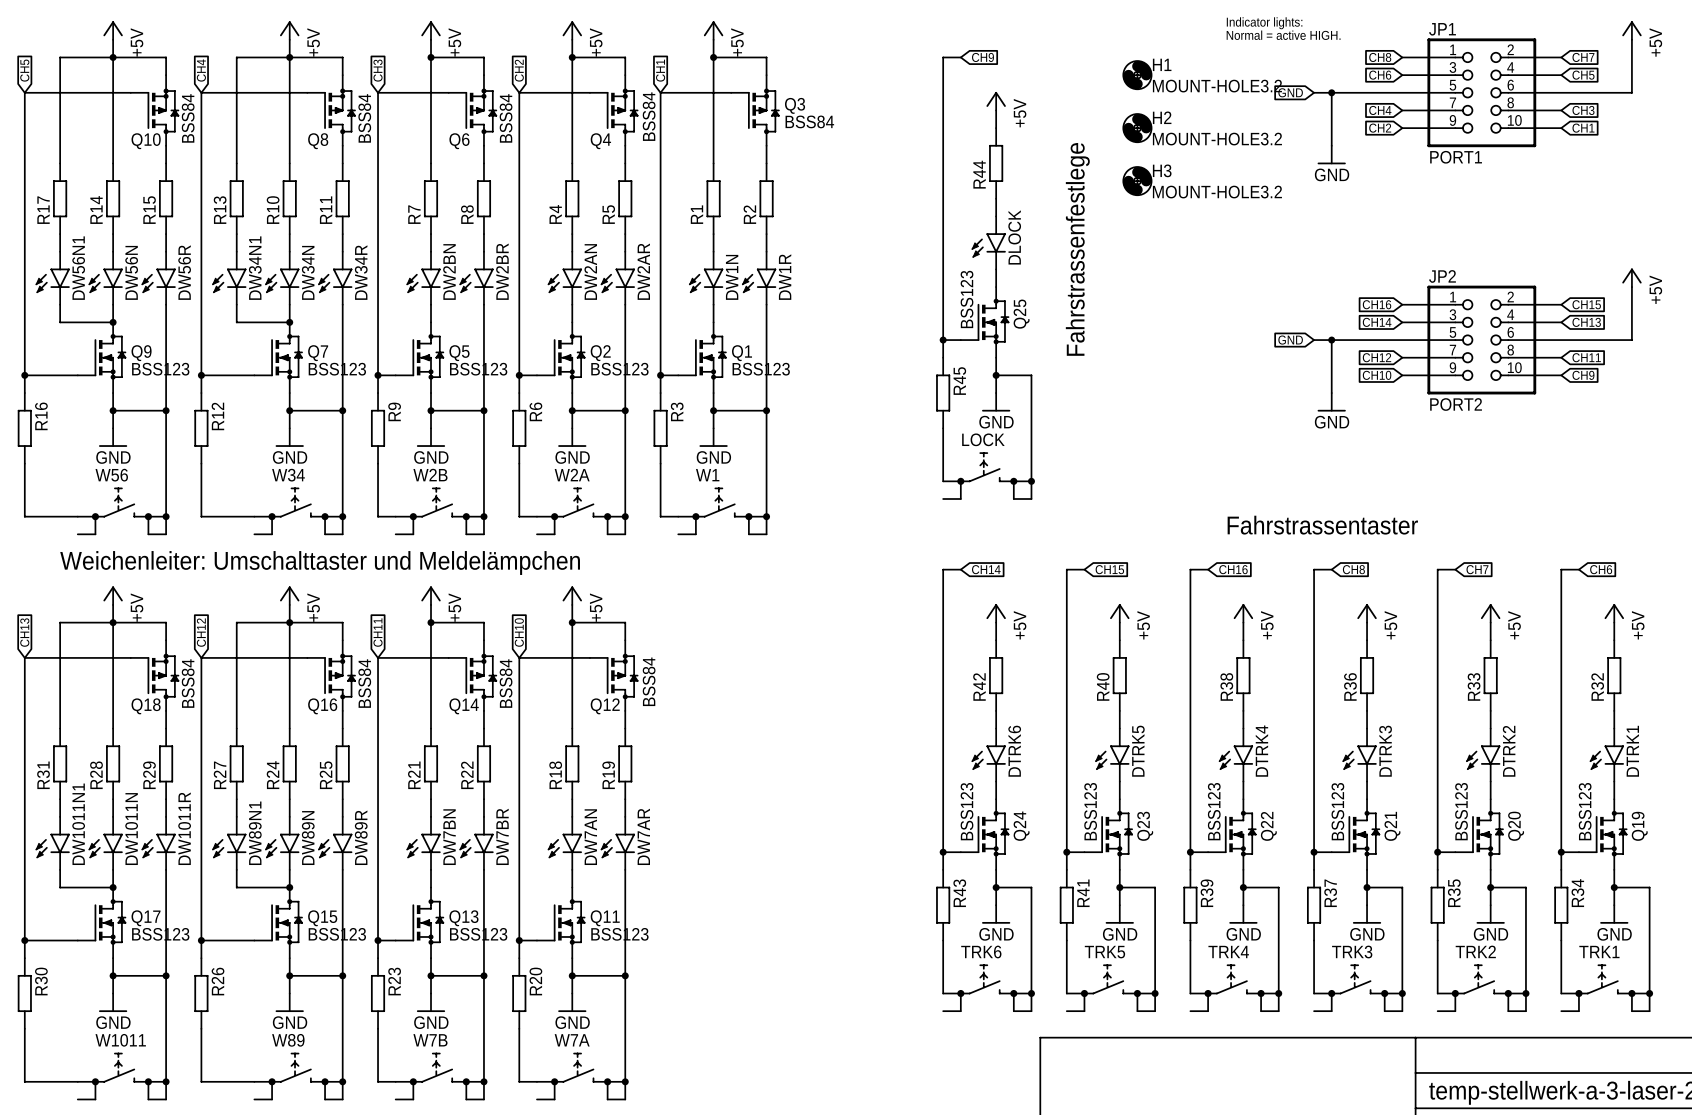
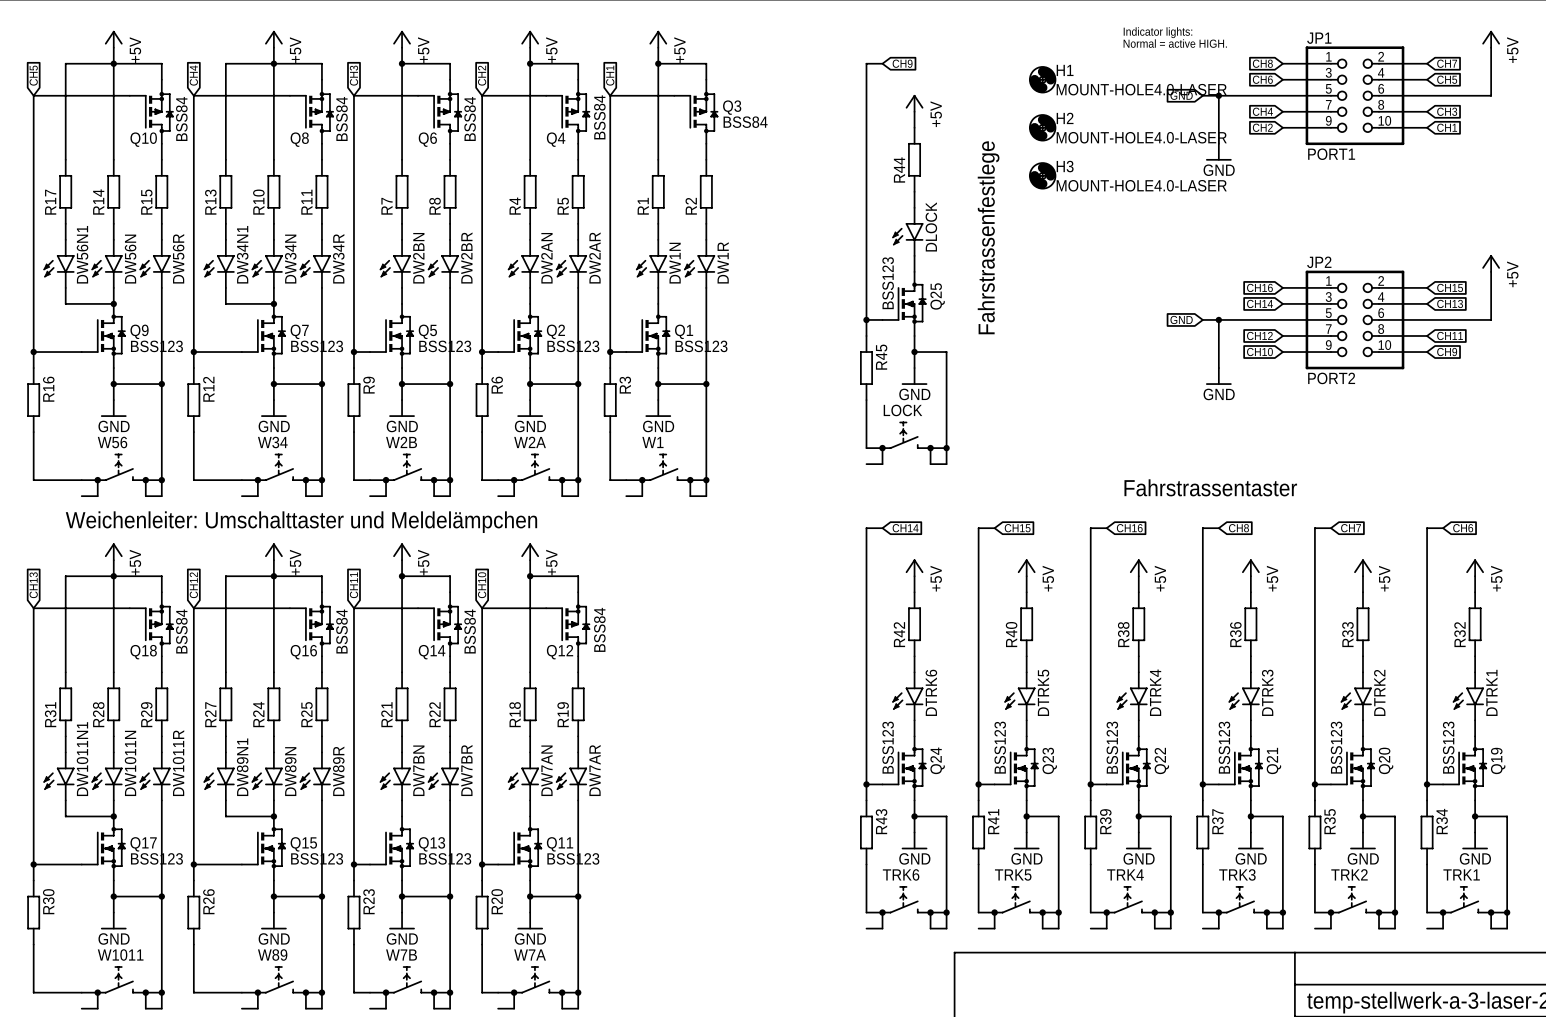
H1 value: MOUNT-HOLE3.2 (1217, 86) -> MOUNT-HOLE4.0-LASER (1141, 89)
H2 value: MOUNT-HOLE3.2 (1217, 139) -> MOUNT-HOLE4.0-LASER (1141, 137)
H3 value: MOUNT-HOLE3.2 (1217, 192) -> MOUNT-HOLE4.0-LASER (1141, 185)

